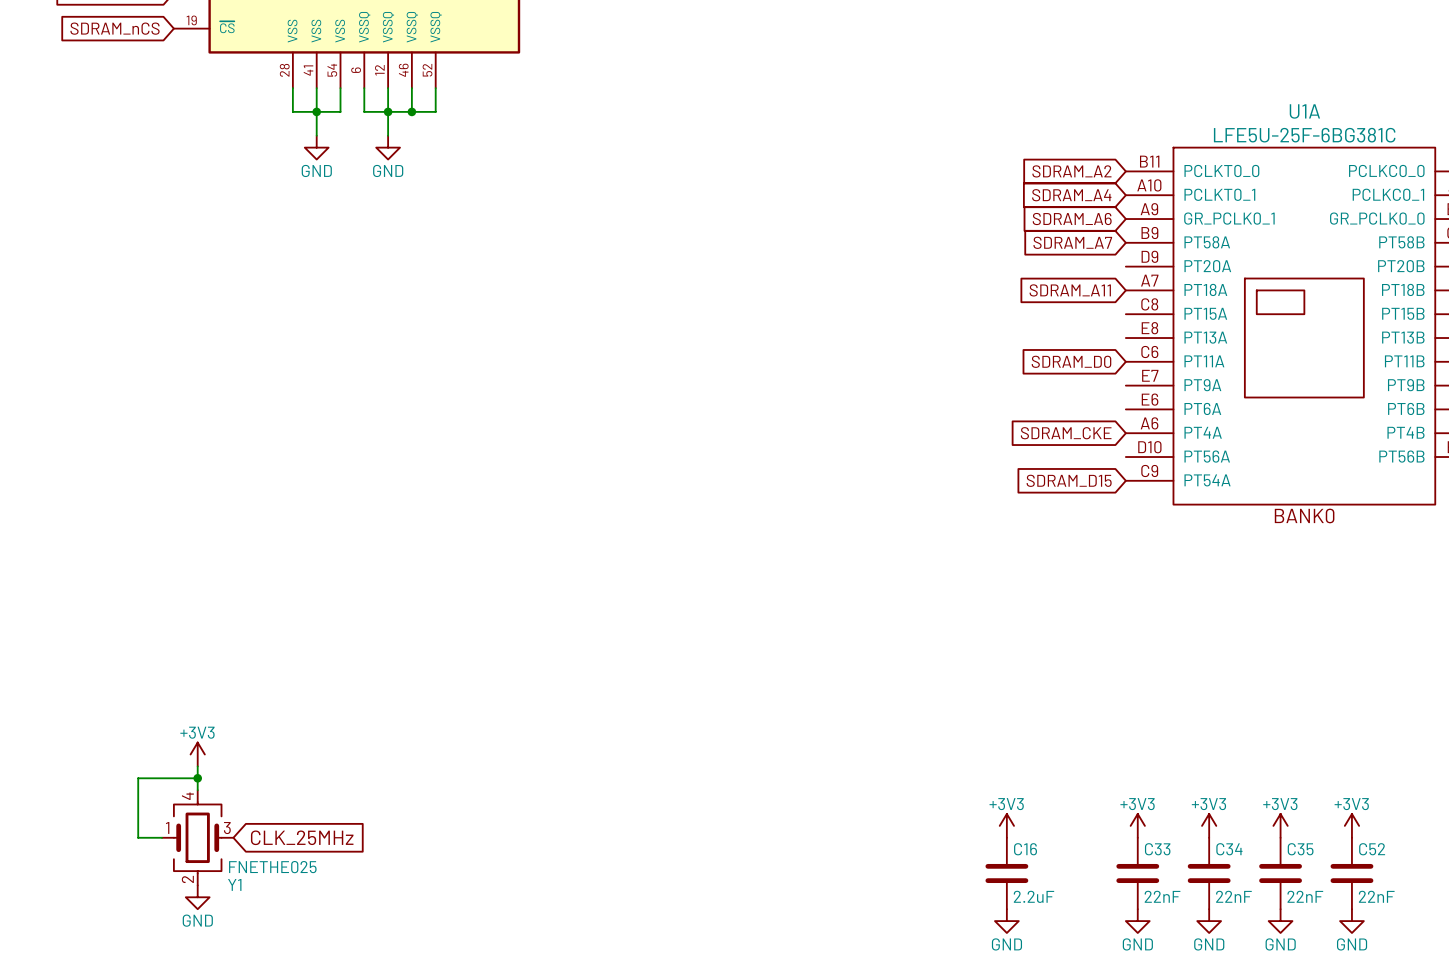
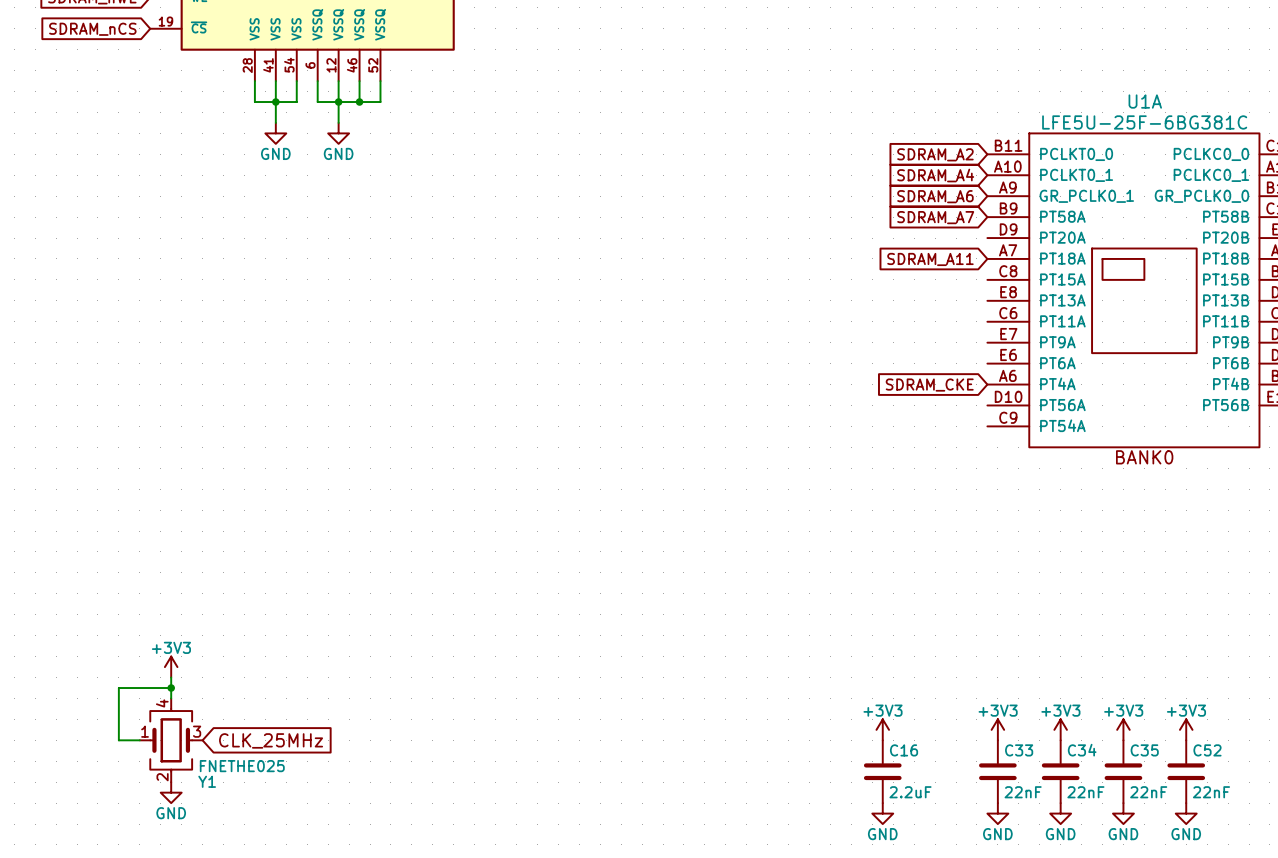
global label: SDRAM_D0 (1071, 361) -> none
global label: SDRAM_D15 (1069, 480) -> none

